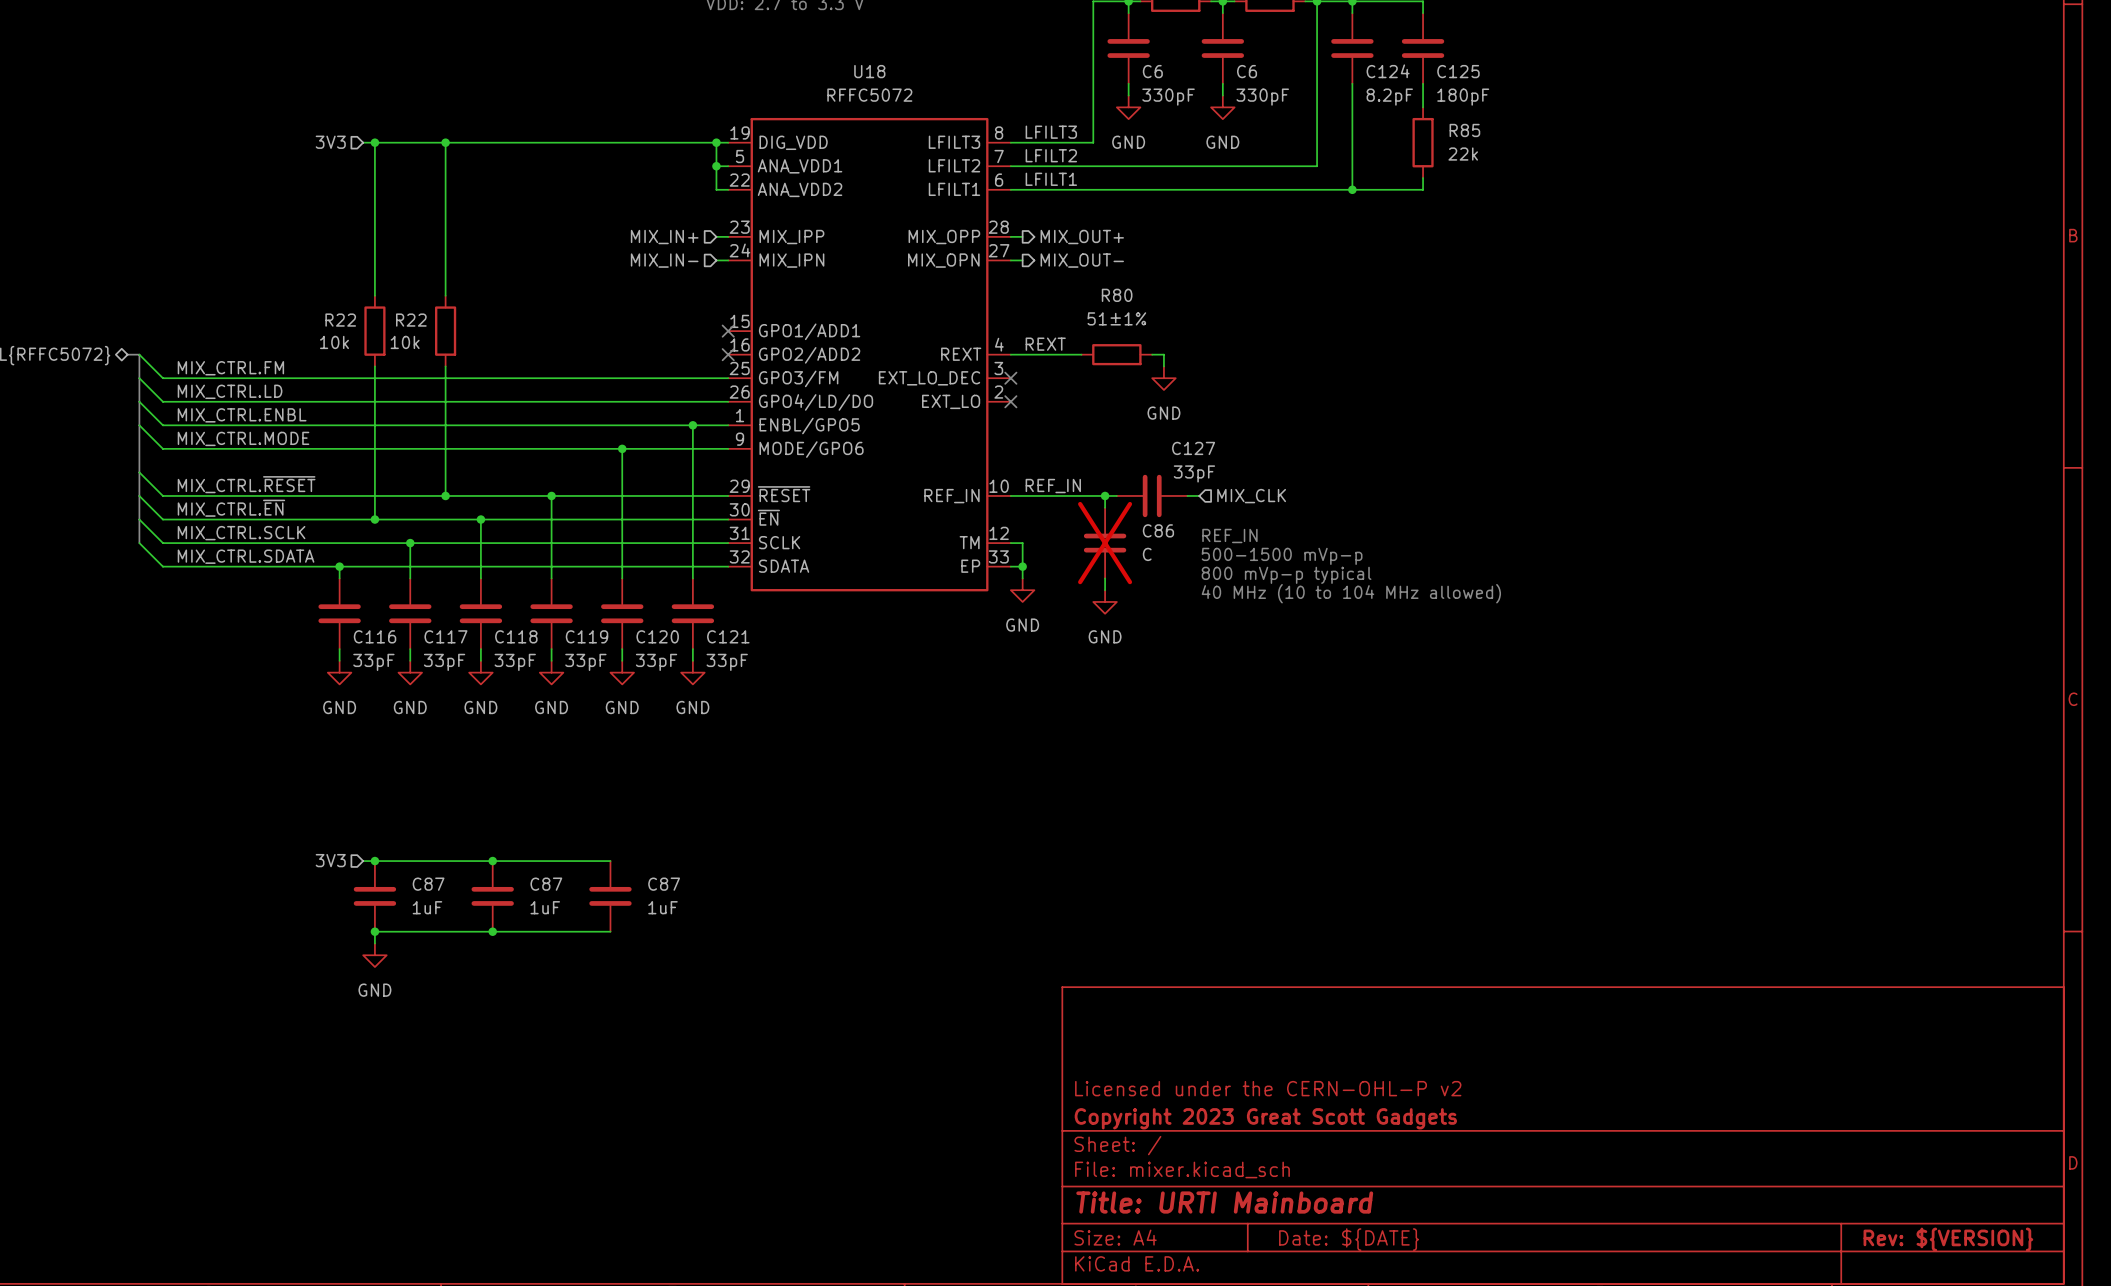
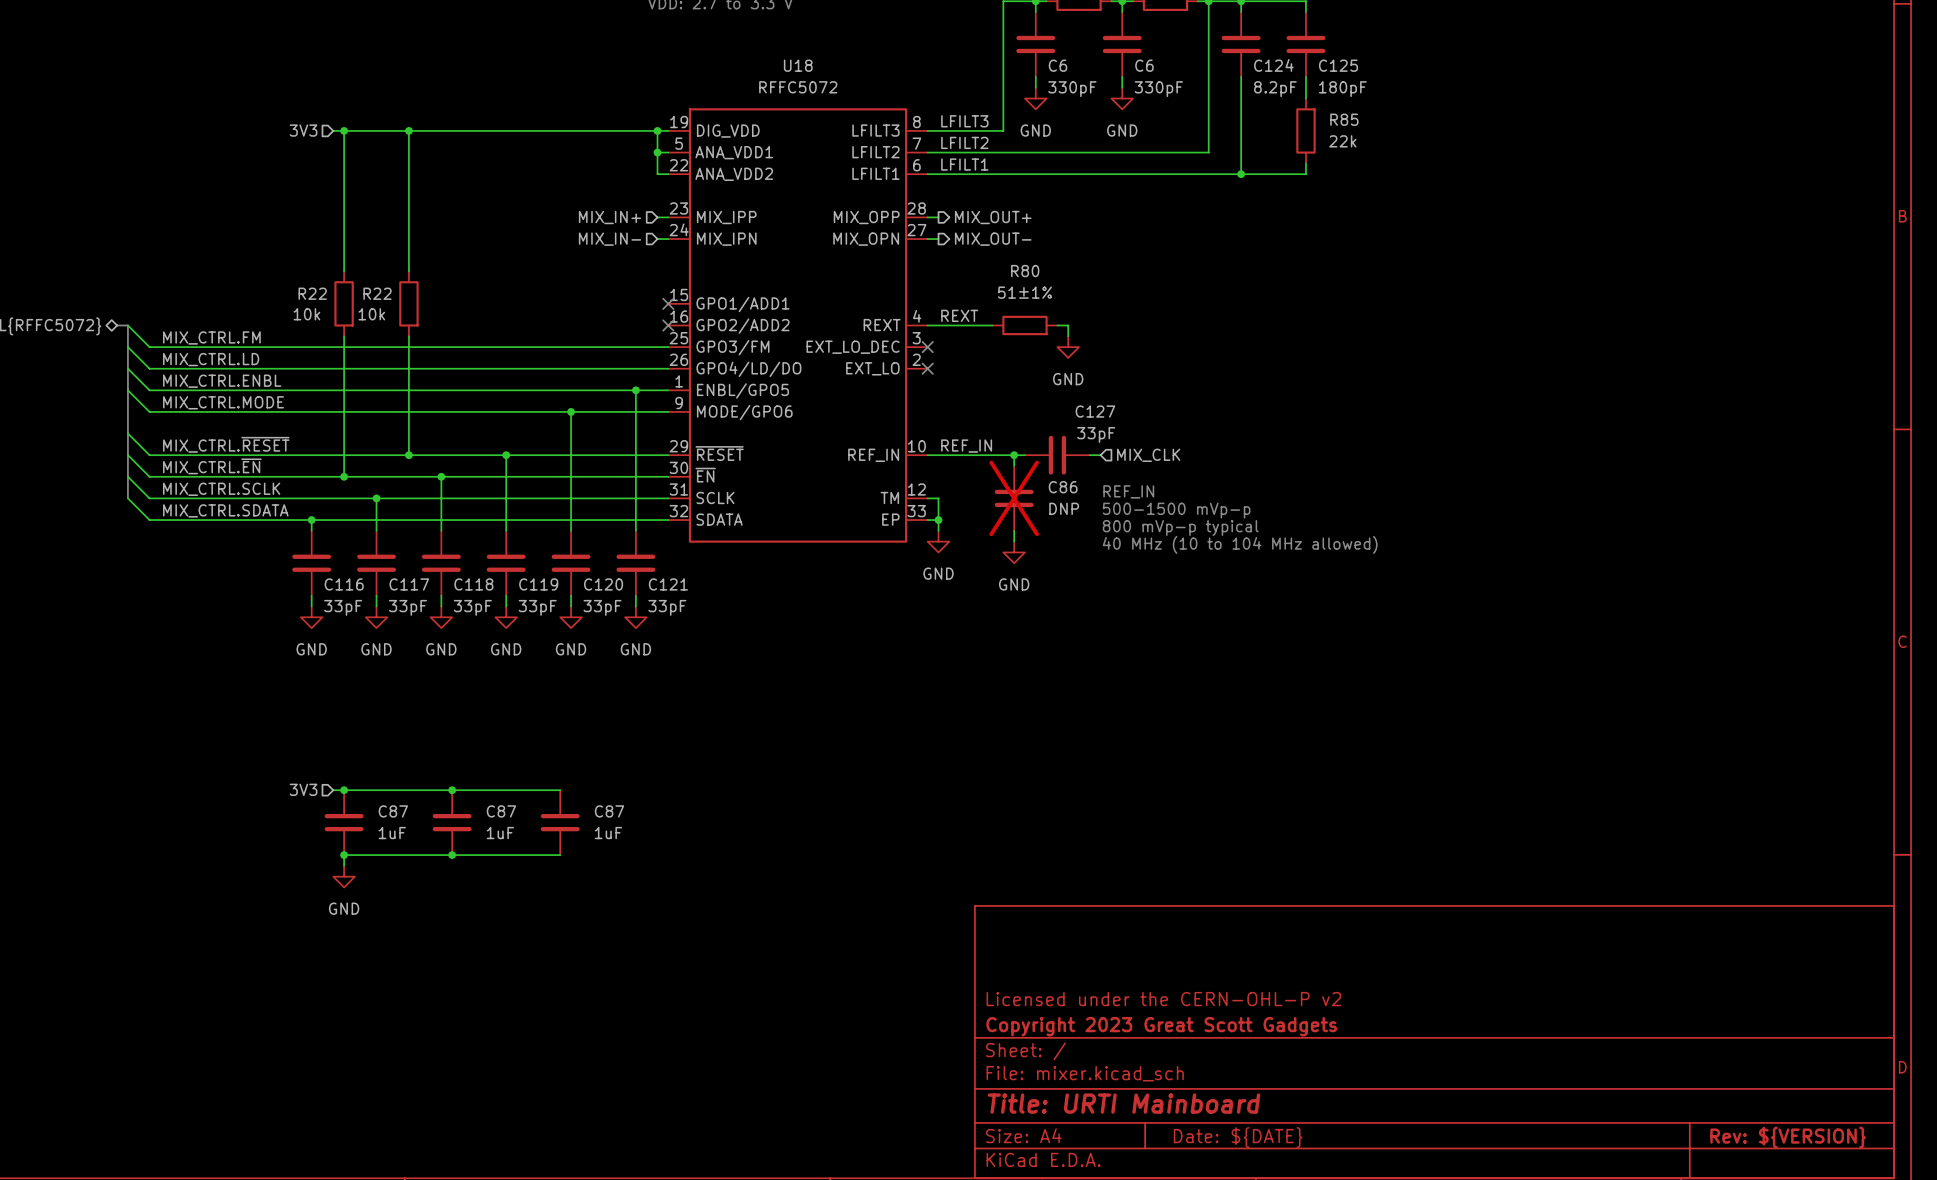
C86 value: C (1147, 554) -> DNP (1064, 508)

